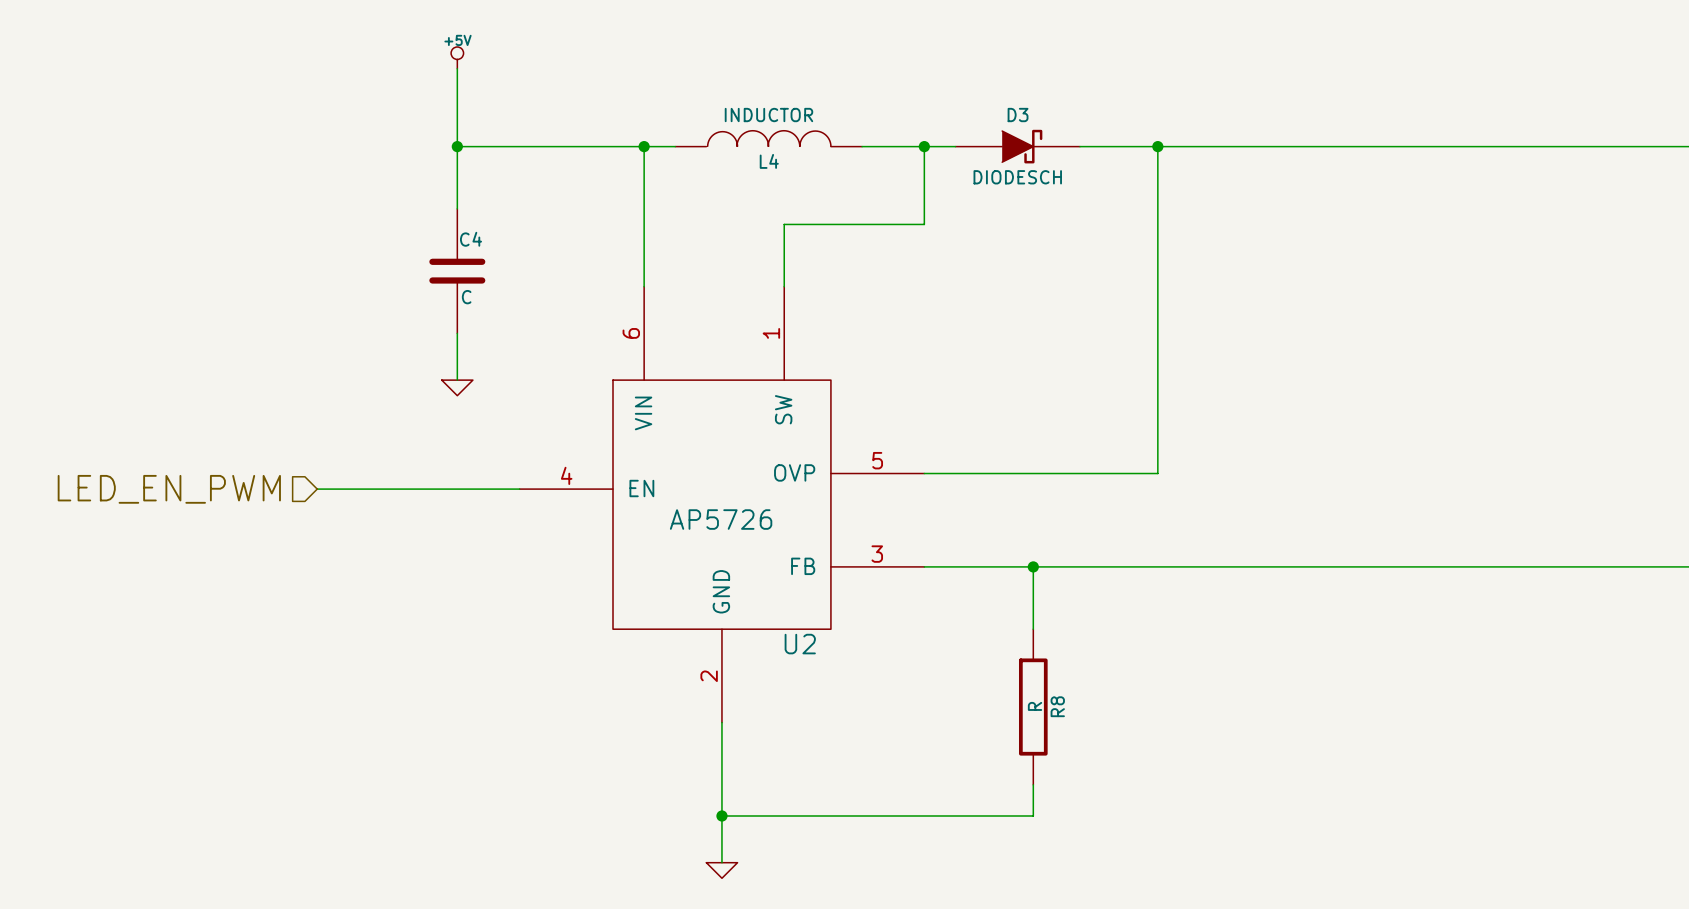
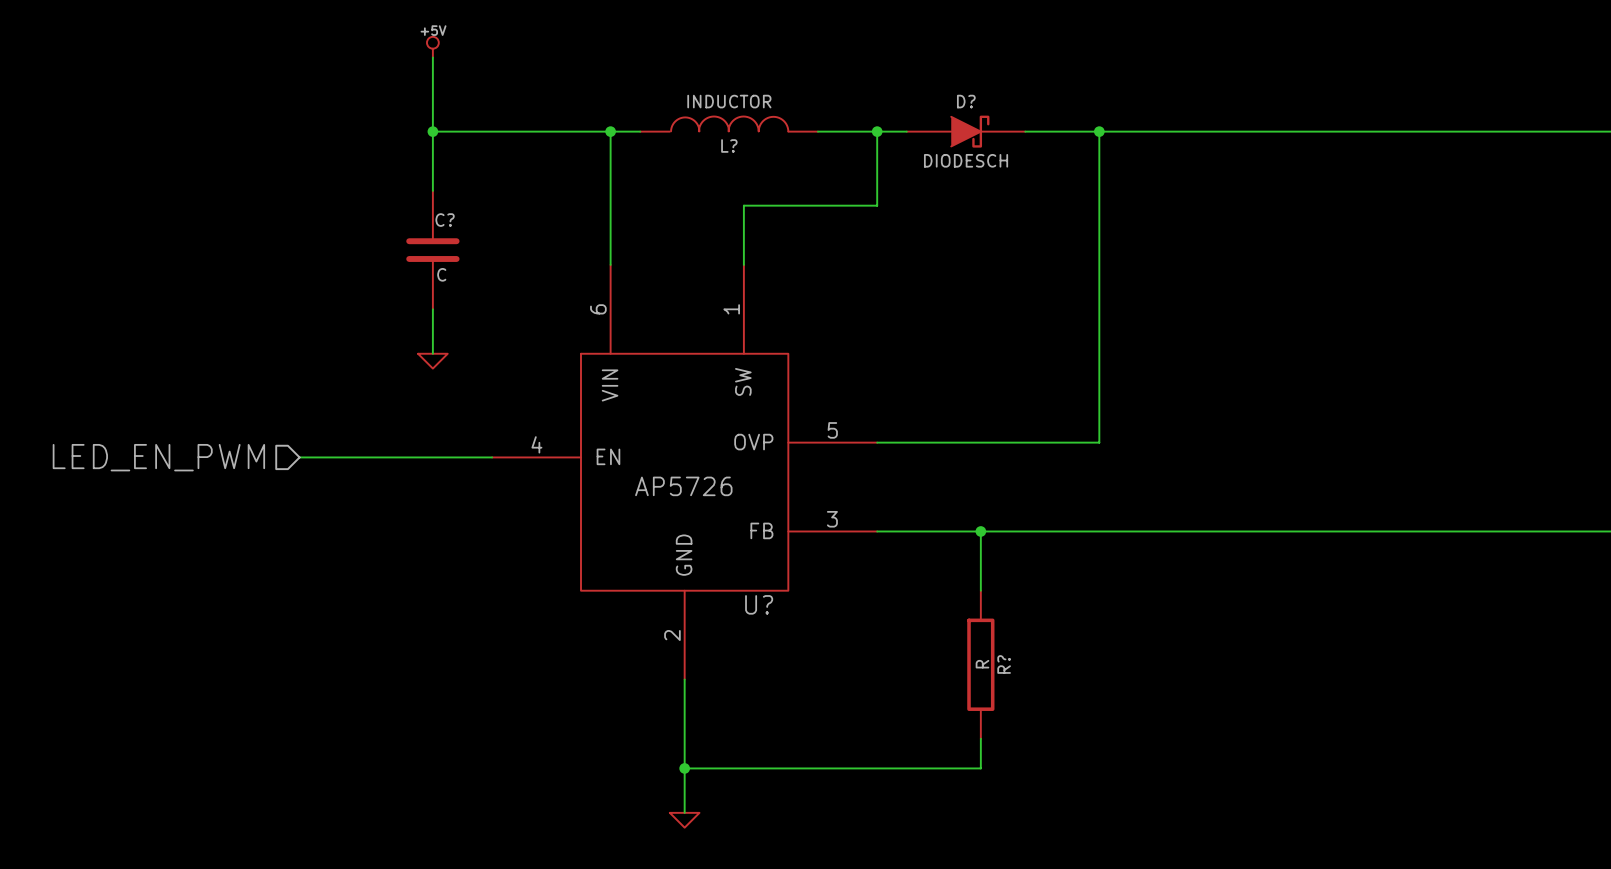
D3 name: D3 (1018, 115) -> D? (966, 101)
L4 name: L4 (769, 161) -> L? (729, 145)
C4 name: C4 (471, 239) -> C? (445, 220)
U2 name: U2 (800, 644) -> U? (759, 604)
R8 name: R8 (1057, 706) -> R? (1004, 664)

